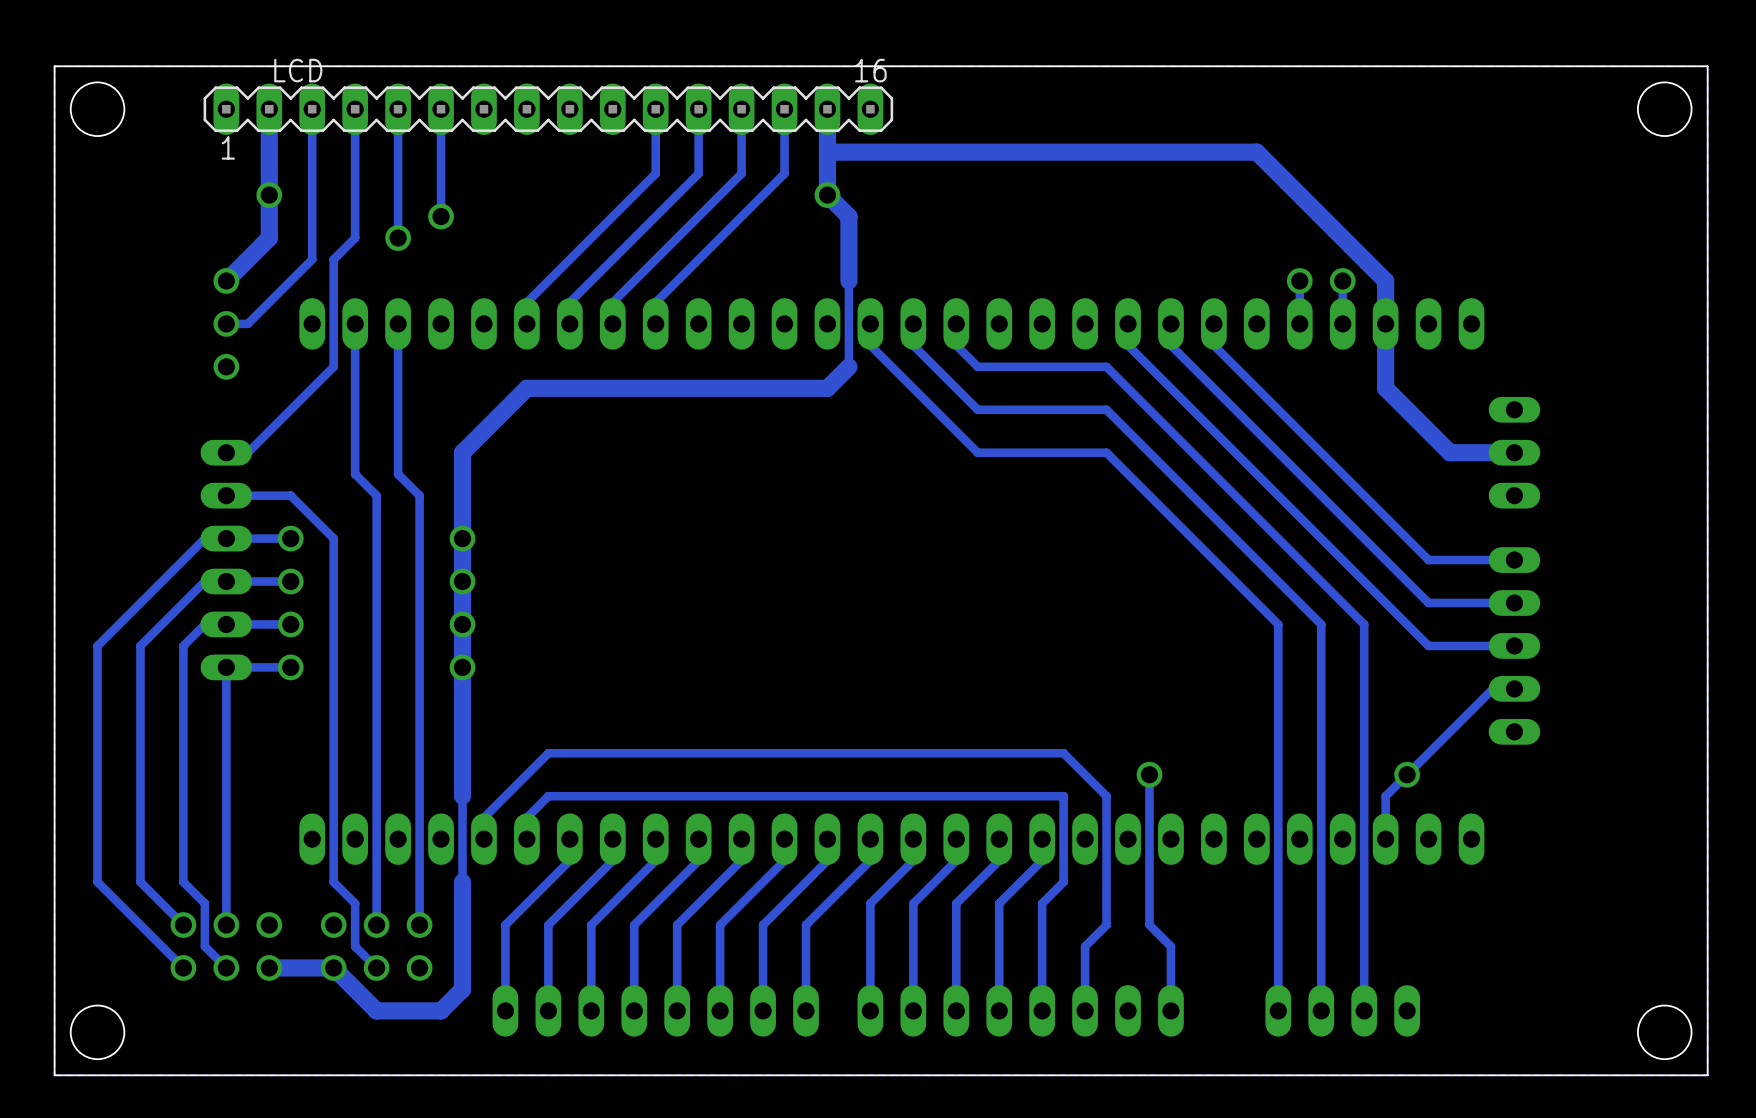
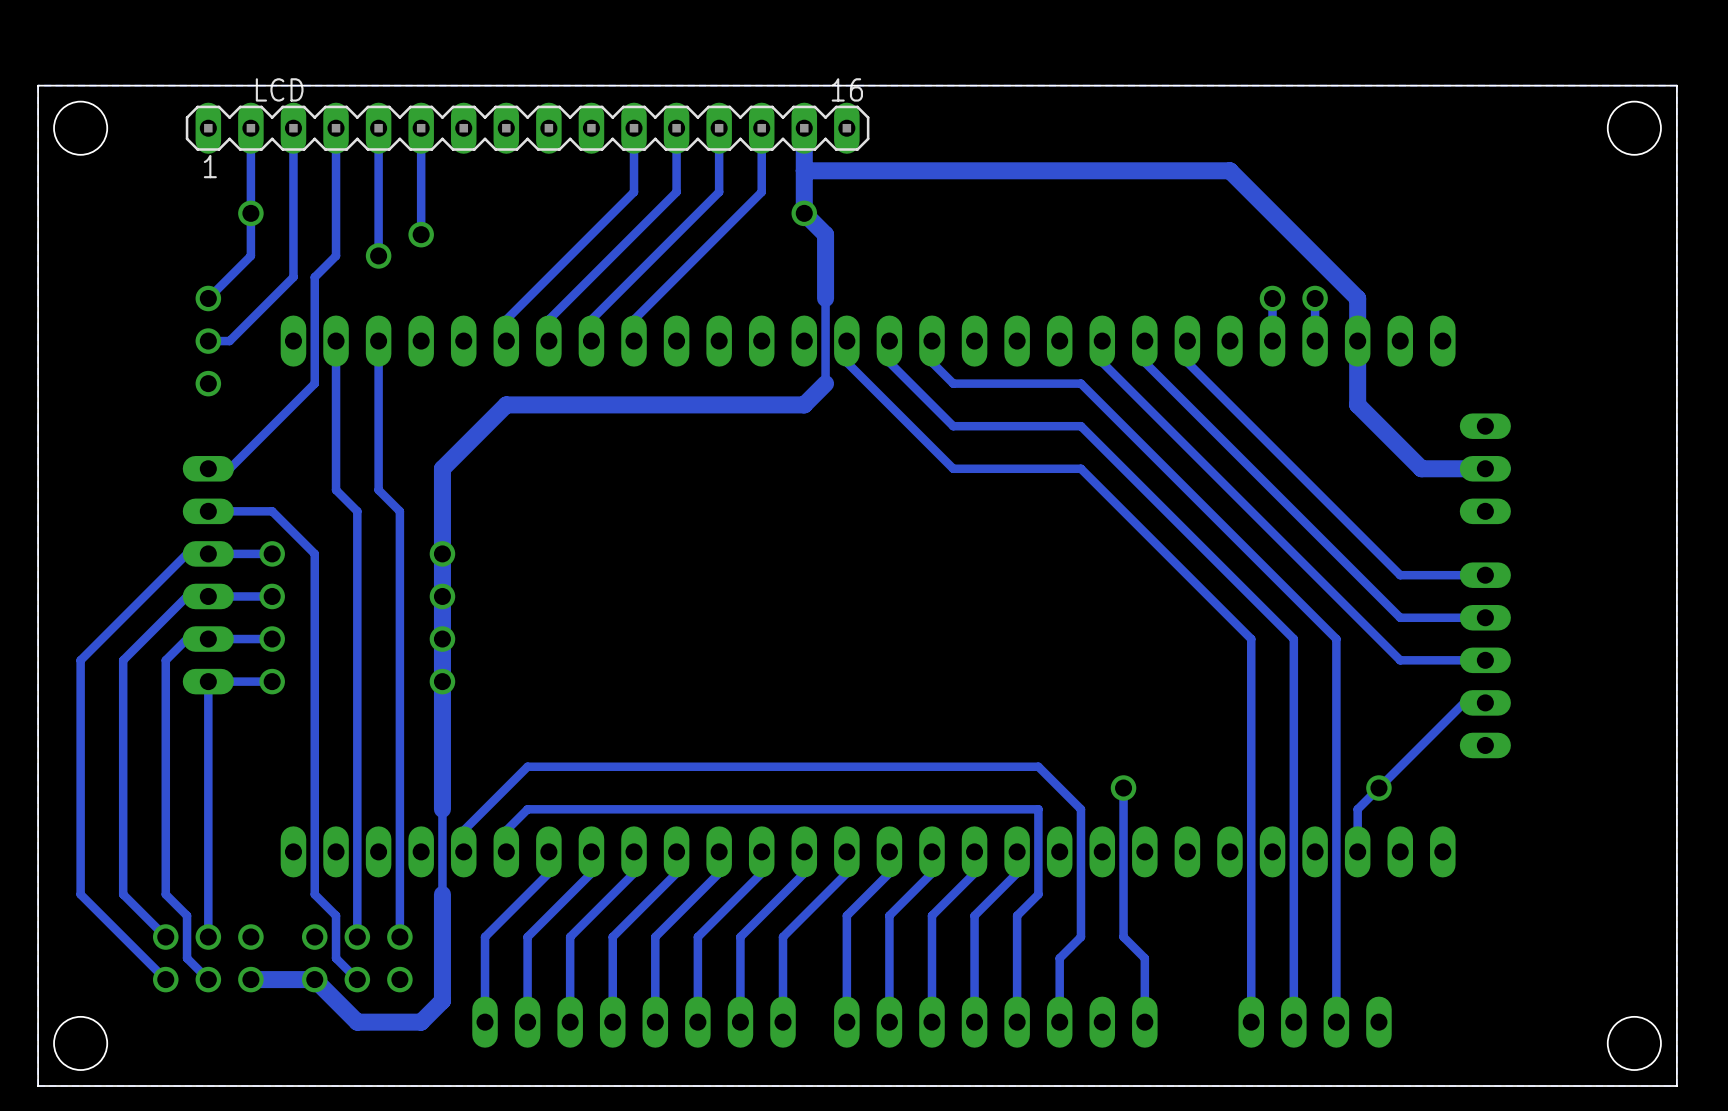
track width: thick (269, 109) (269, 238) (226, 280) -> thin (250, 128) (250, 255) (208, 298)

